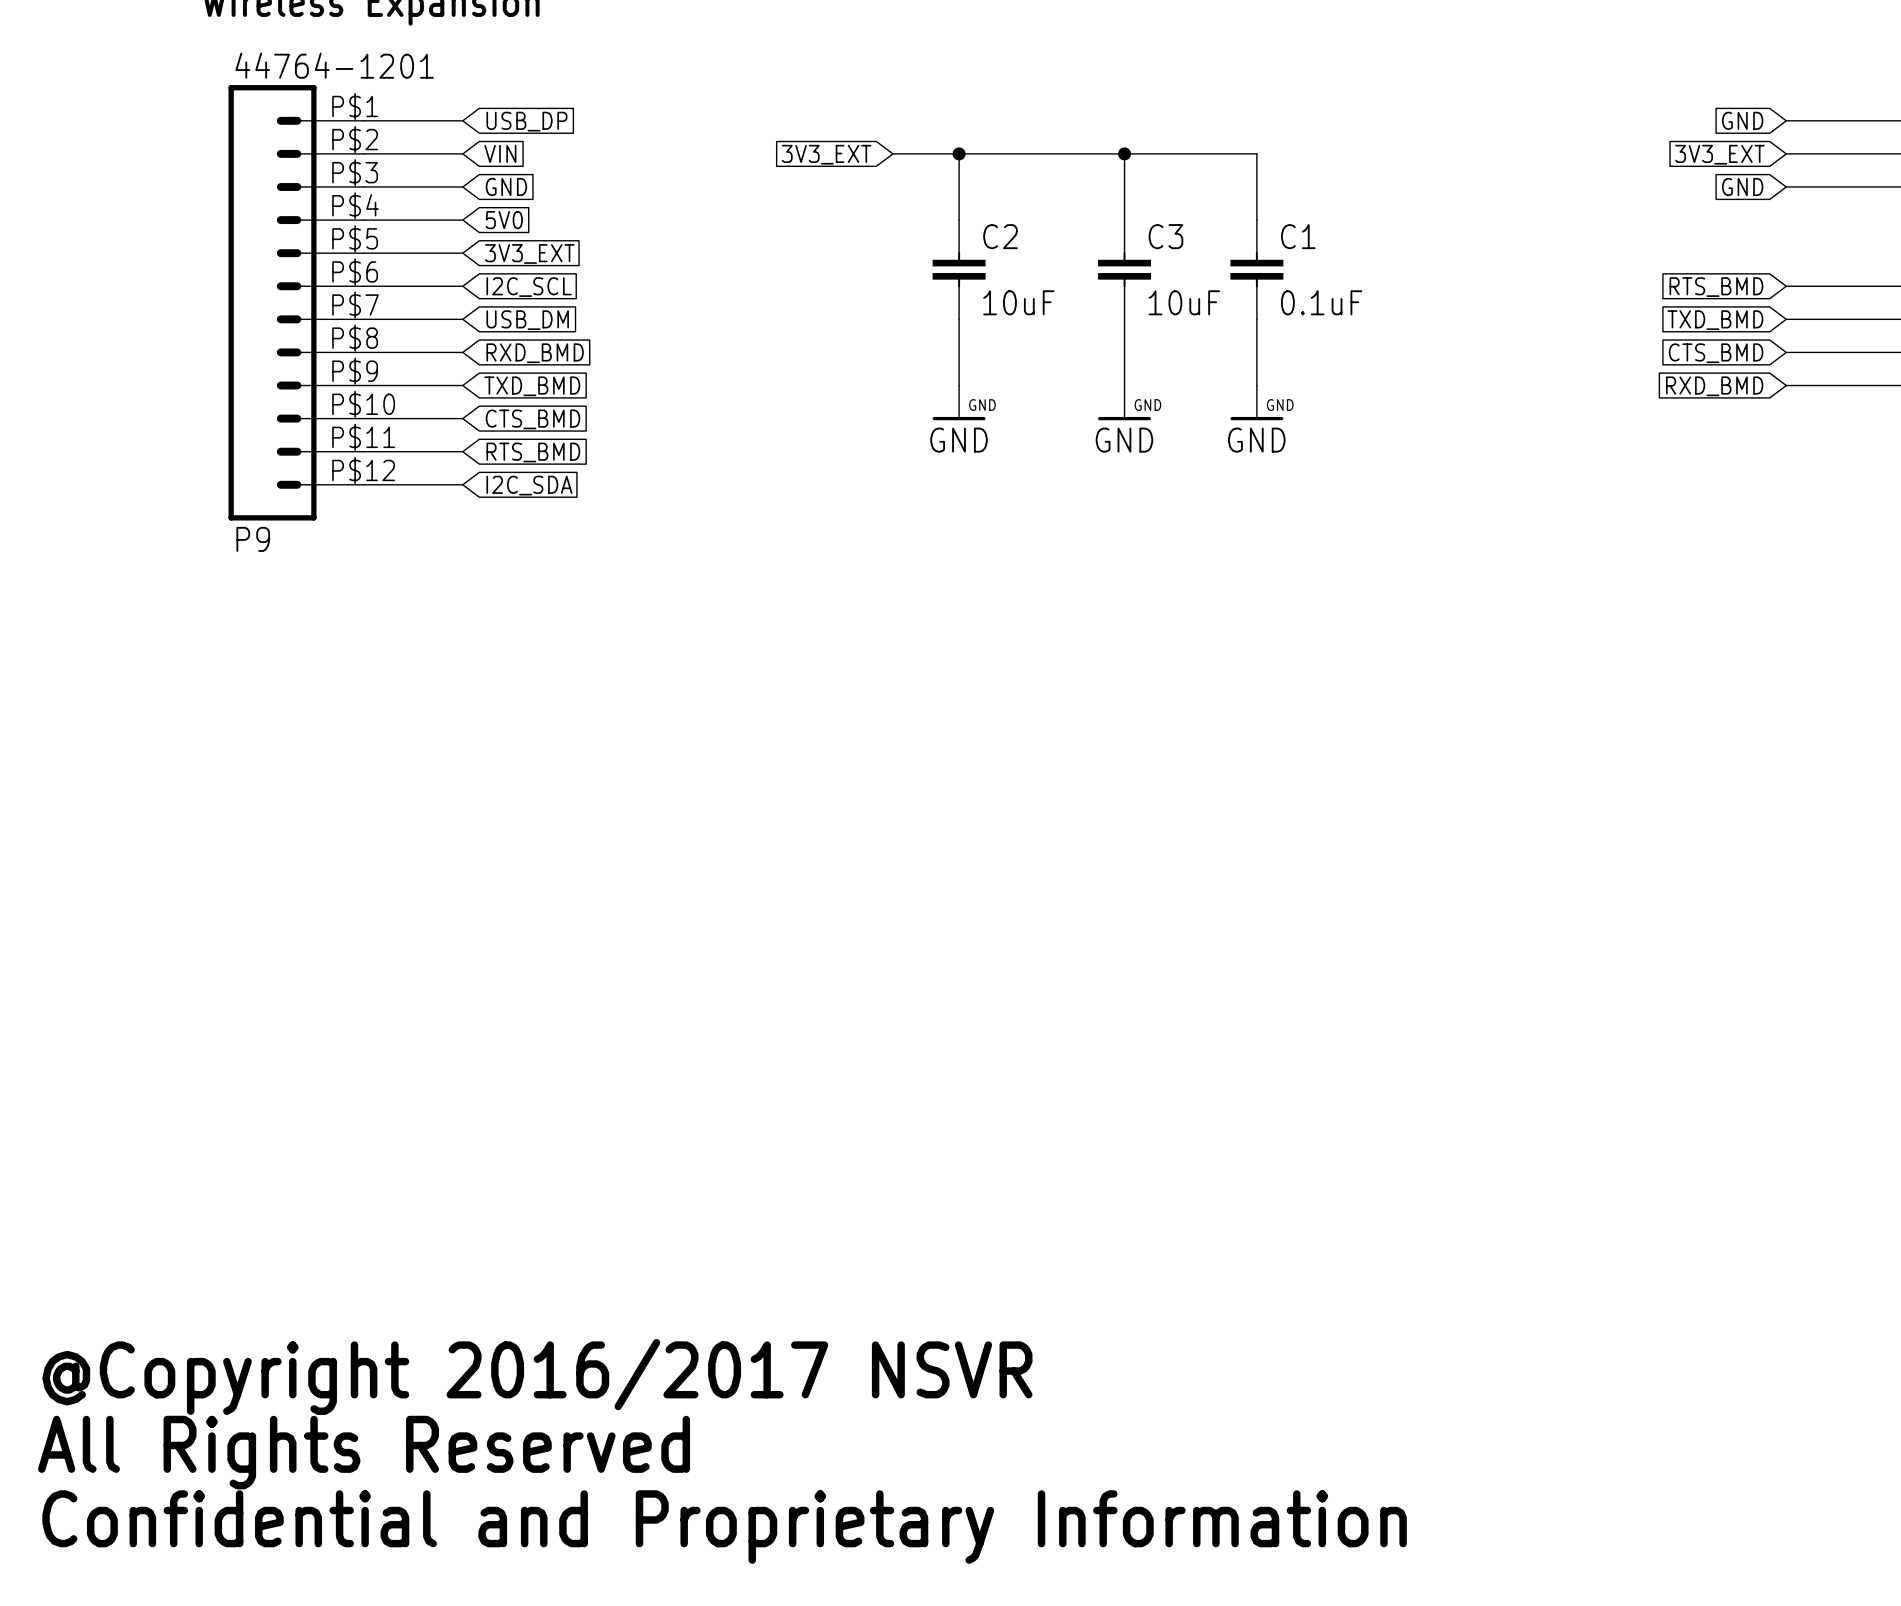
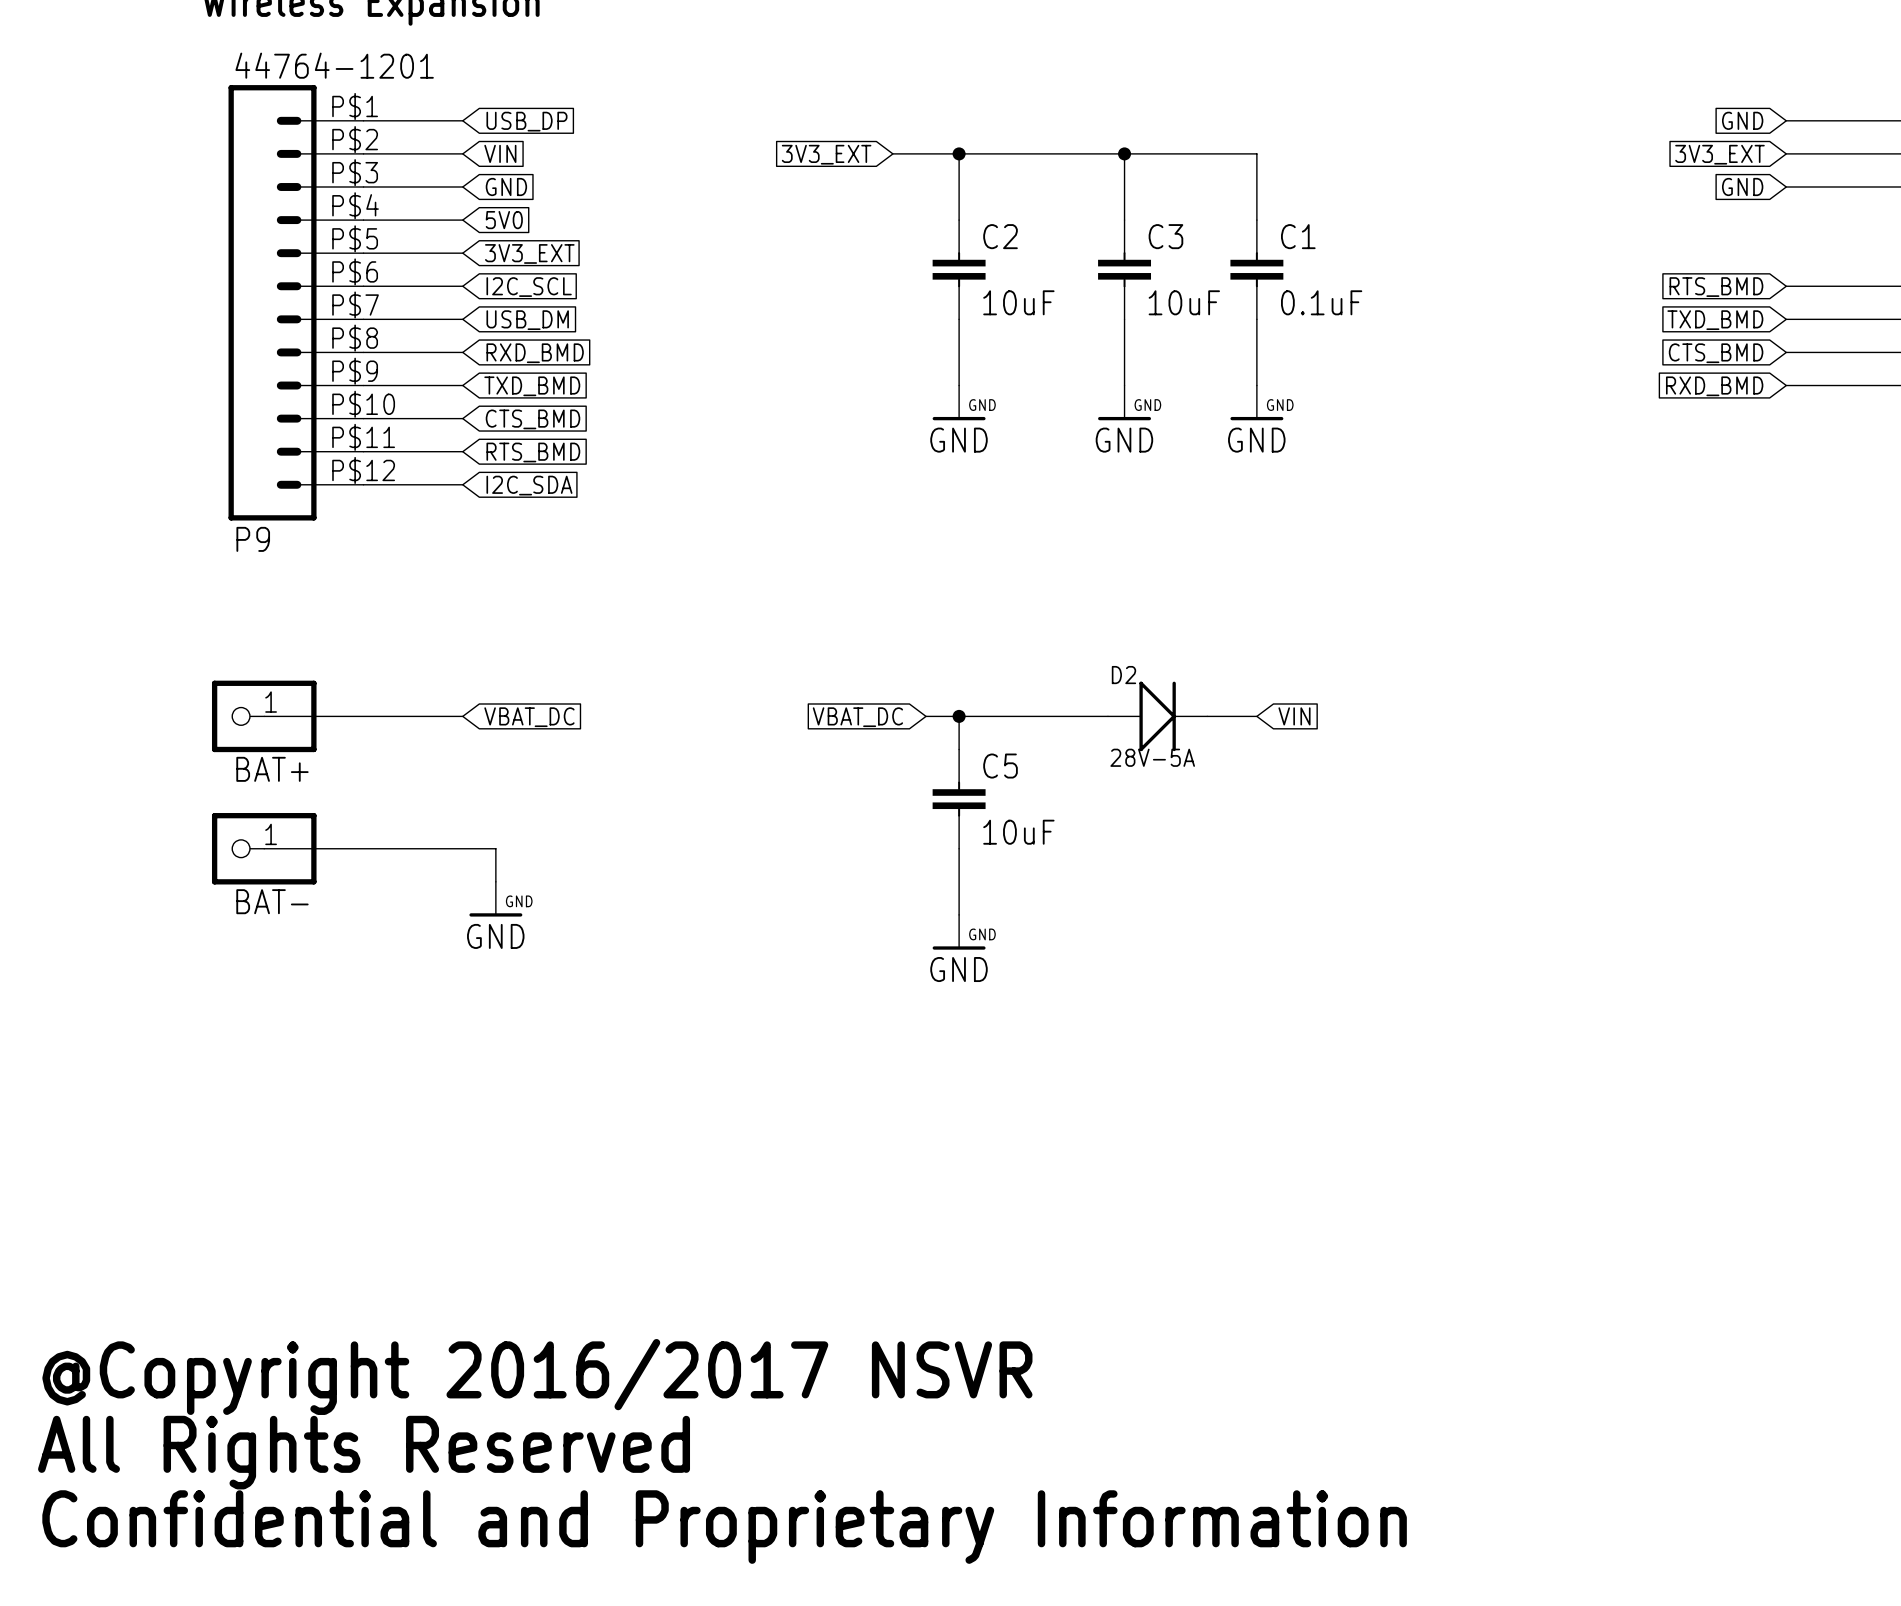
wire: none -> (264, 716) (462, 716)
BAT+: none -> (264, 716)
wire: none -> (926, 716) (1107, 716)
wire: none -> (959, 716) (959, 749)
junction: none -> (959, 716)
D2: none -> 28V-5A (1157, 716)
wire: none -> (1207, 716) (1256, 716)
global label: none -> VIN (1294, 716)
global label: none -> VBAT_DC (529, 717)
global label: none -> VBAT_DC (857, 717)
C5: none -> 10uF (959, 799)
wire: none -> (264, 848) (495, 848) (495, 881)
BAT-: none -> (264, 848)
wire: none -> (959, 848) (959, 914)
power symbol: none -> GND (495, 899)
power symbol: none -> GND (959, 932)

